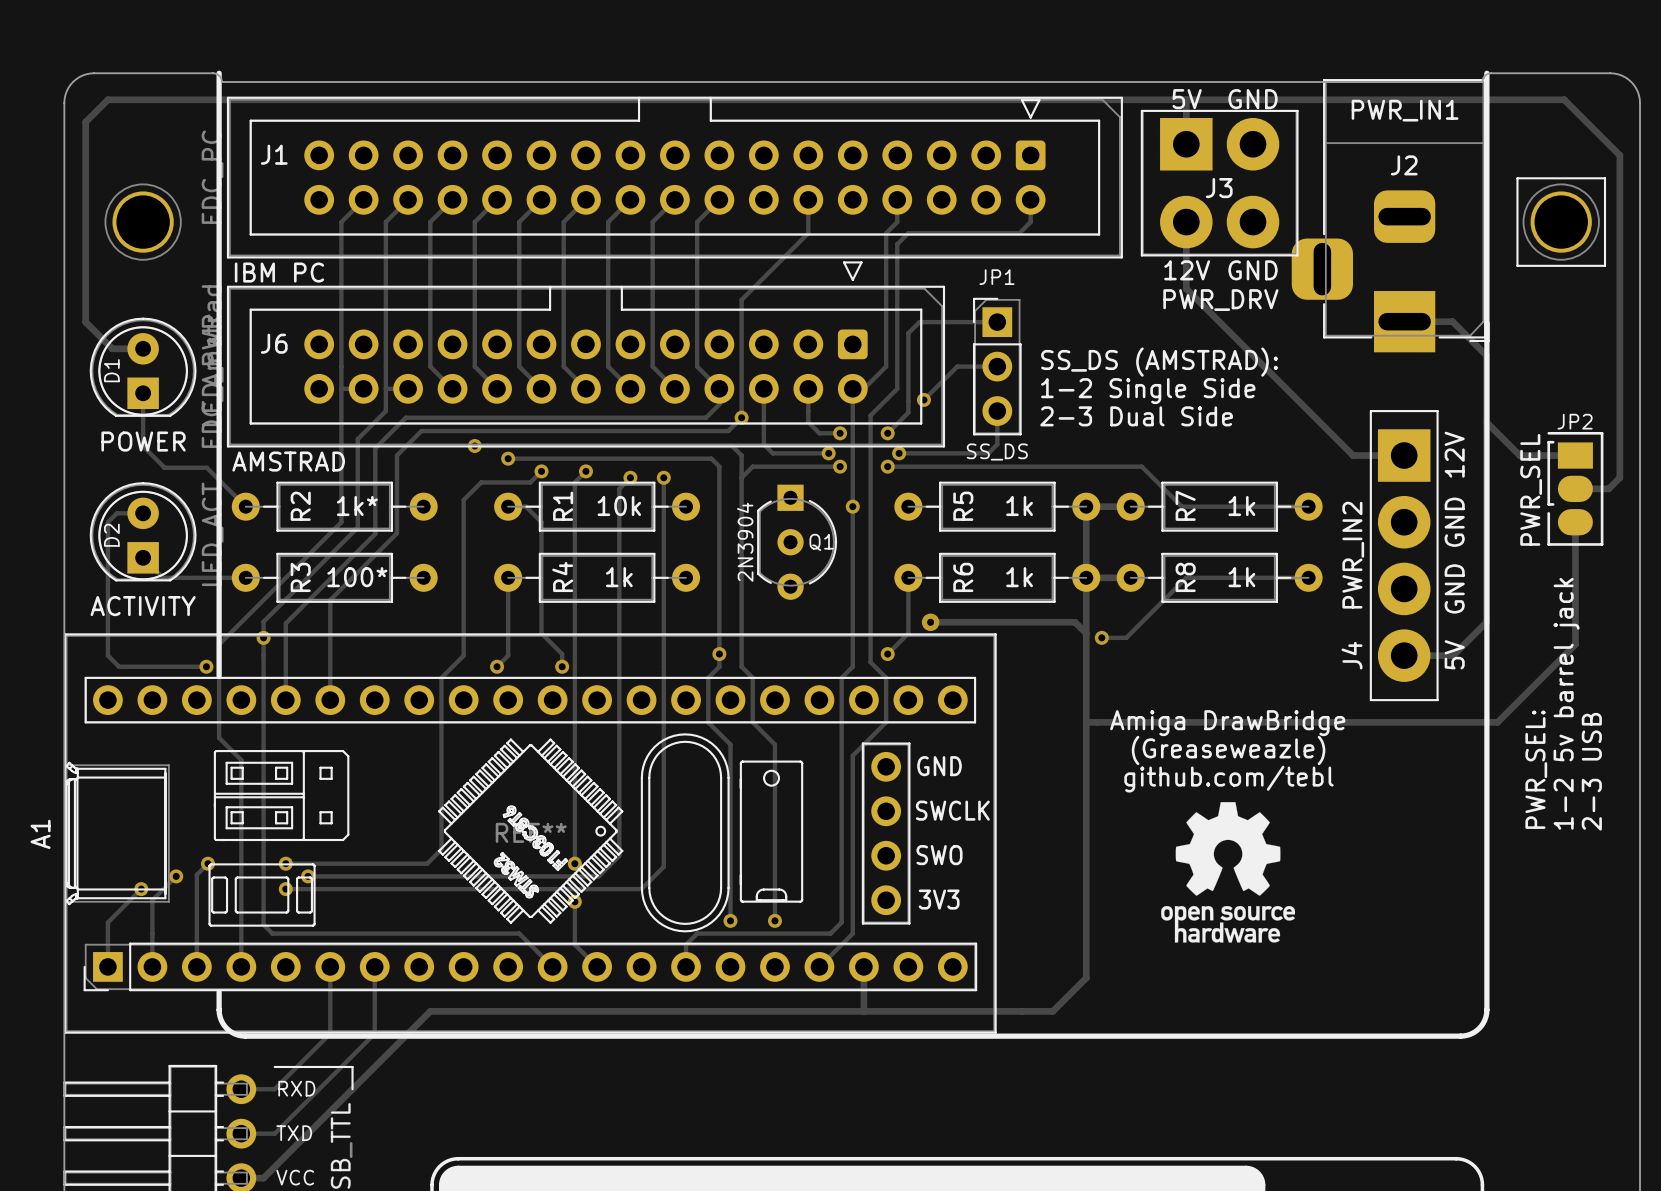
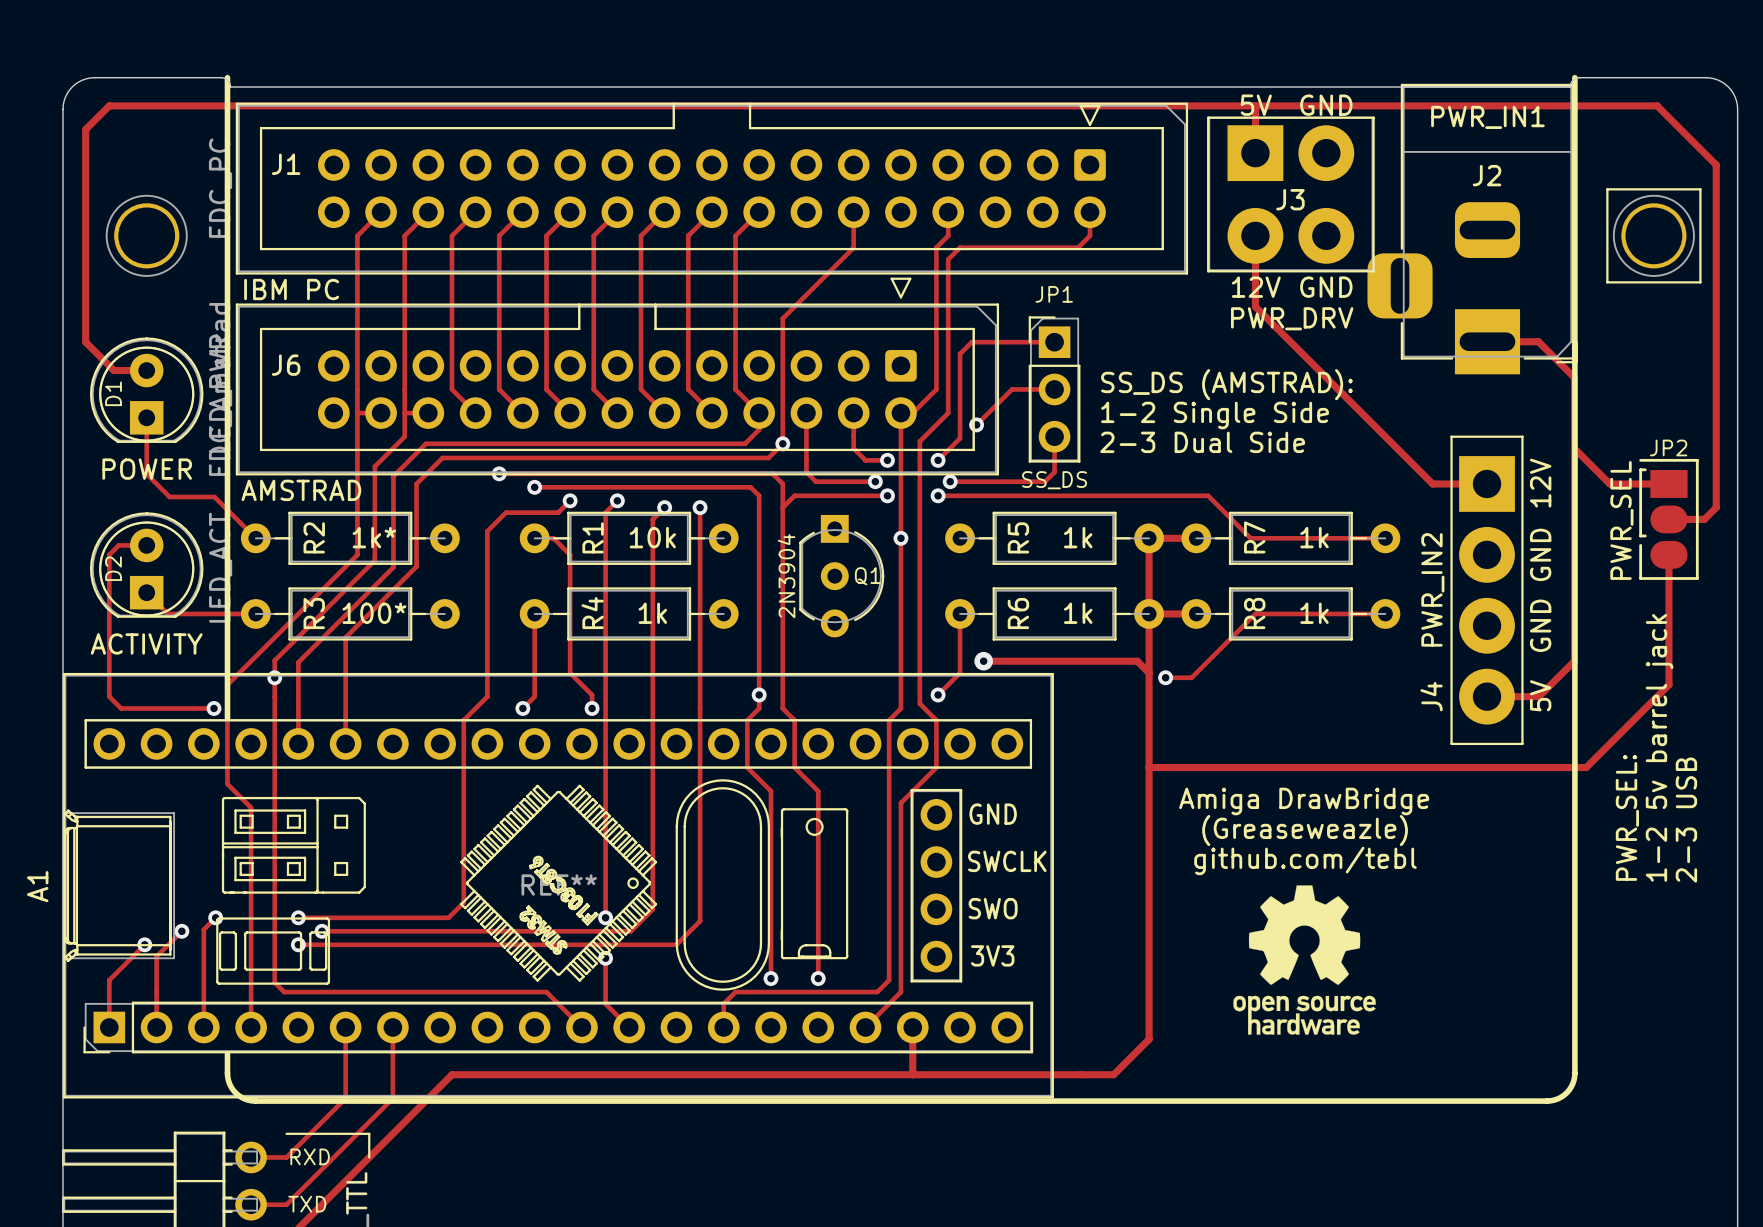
text: Amiga DrawBridge (1227, 723) -> none
text: (Greaseweazle) (1228, 750) -> Amiga DrawBridge (1304, 801)
text: github.com/tebl (1228, 779) -> (Greaseweazle) (1305, 830)
text: none -> github.com/tebl (1305, 860)
drawing position: (1228, 872) -> (1304, 960)

